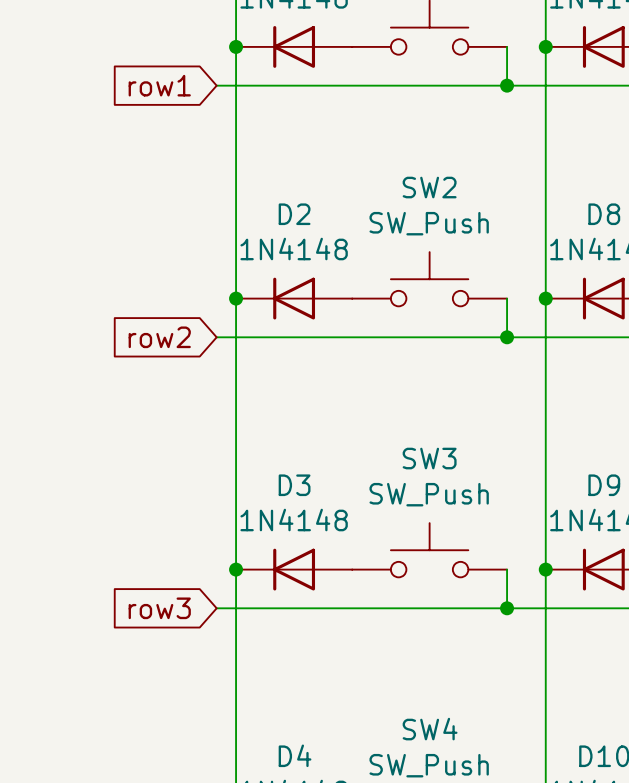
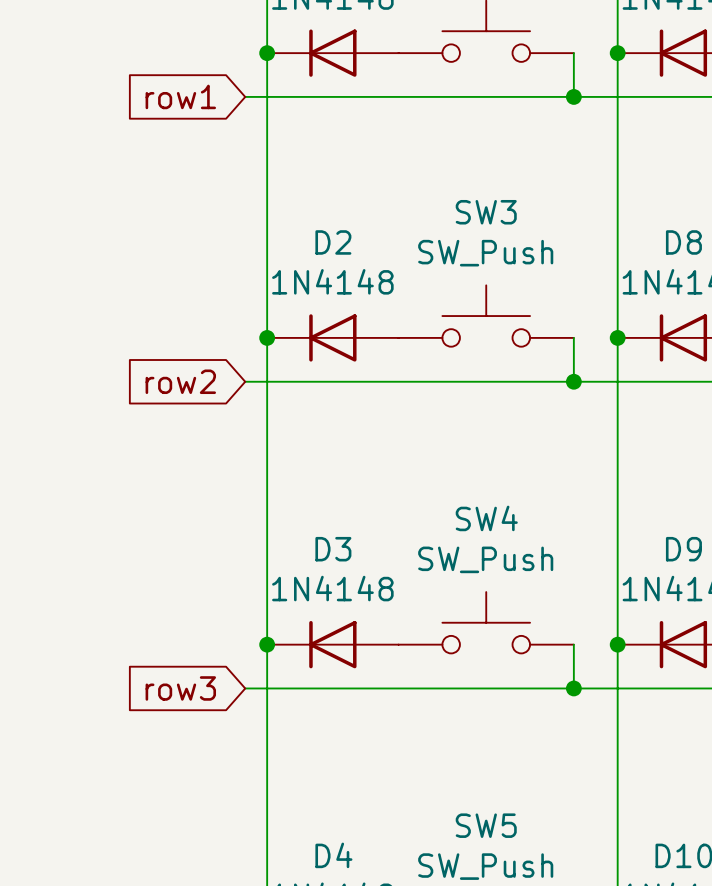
SW2 name: SW2 (429, 187) -> SW3 (486, 212)
SW3 name: SW3 (429, 458) -> SW4 (486, 518)
SW4 name: SW4 (430, 729) -> SW5 (486, 825)

